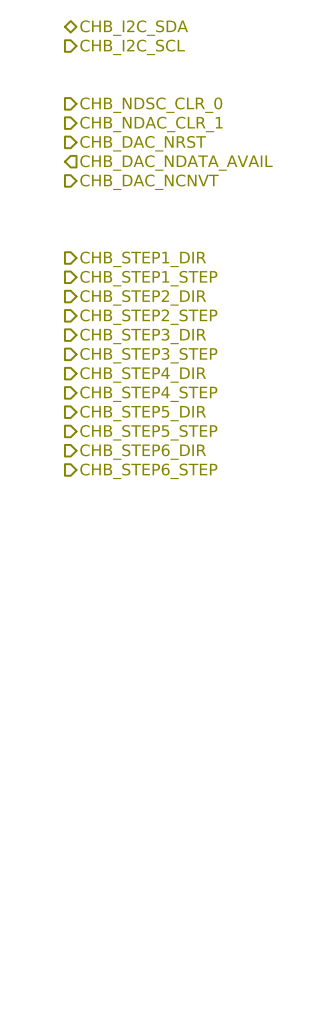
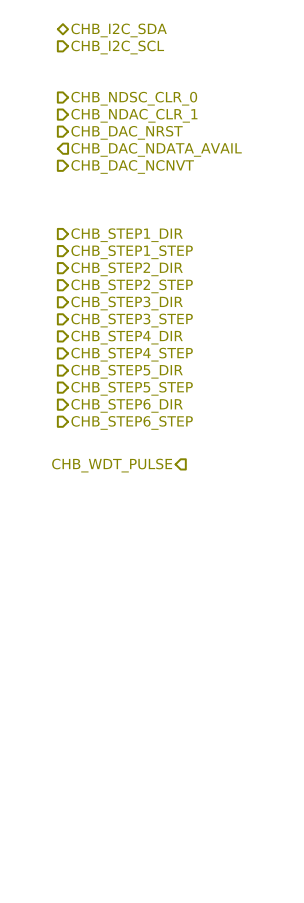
hierarchical label: none -> CHB_WDT_PULSE (112, 465)

